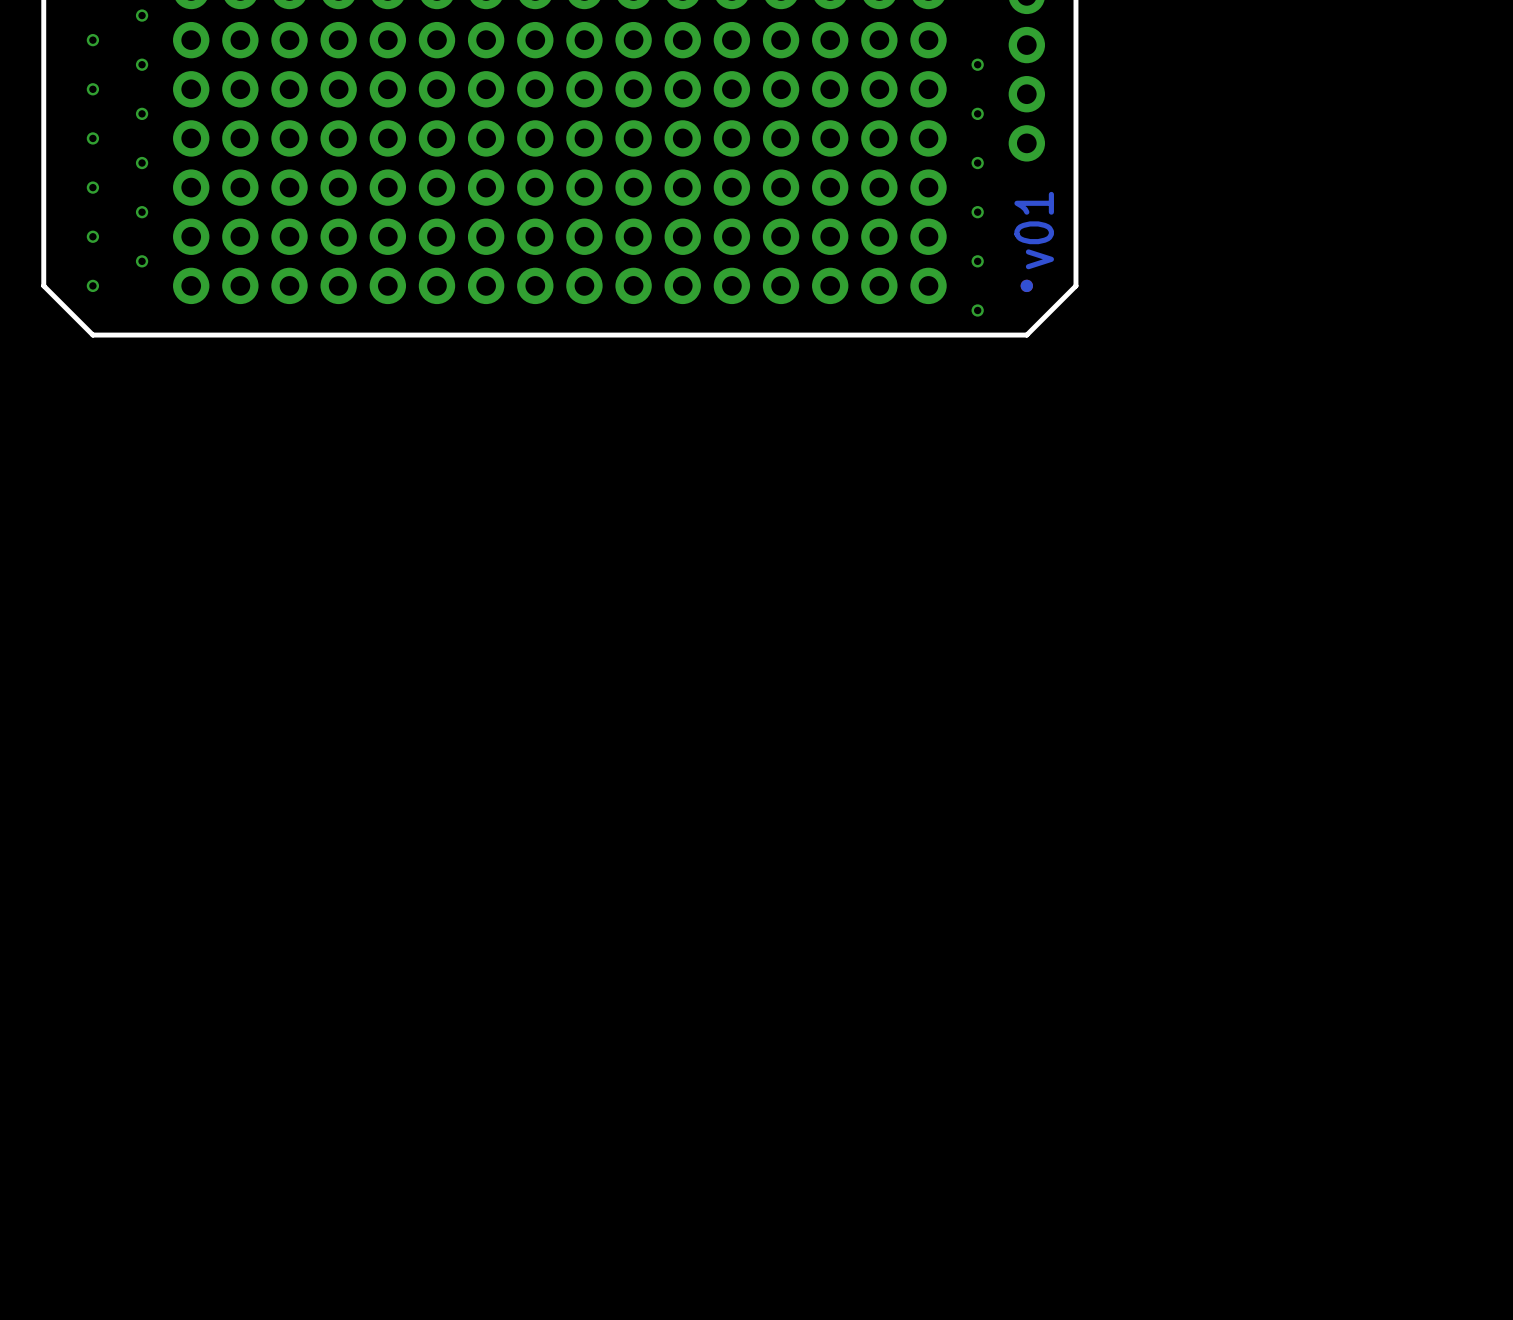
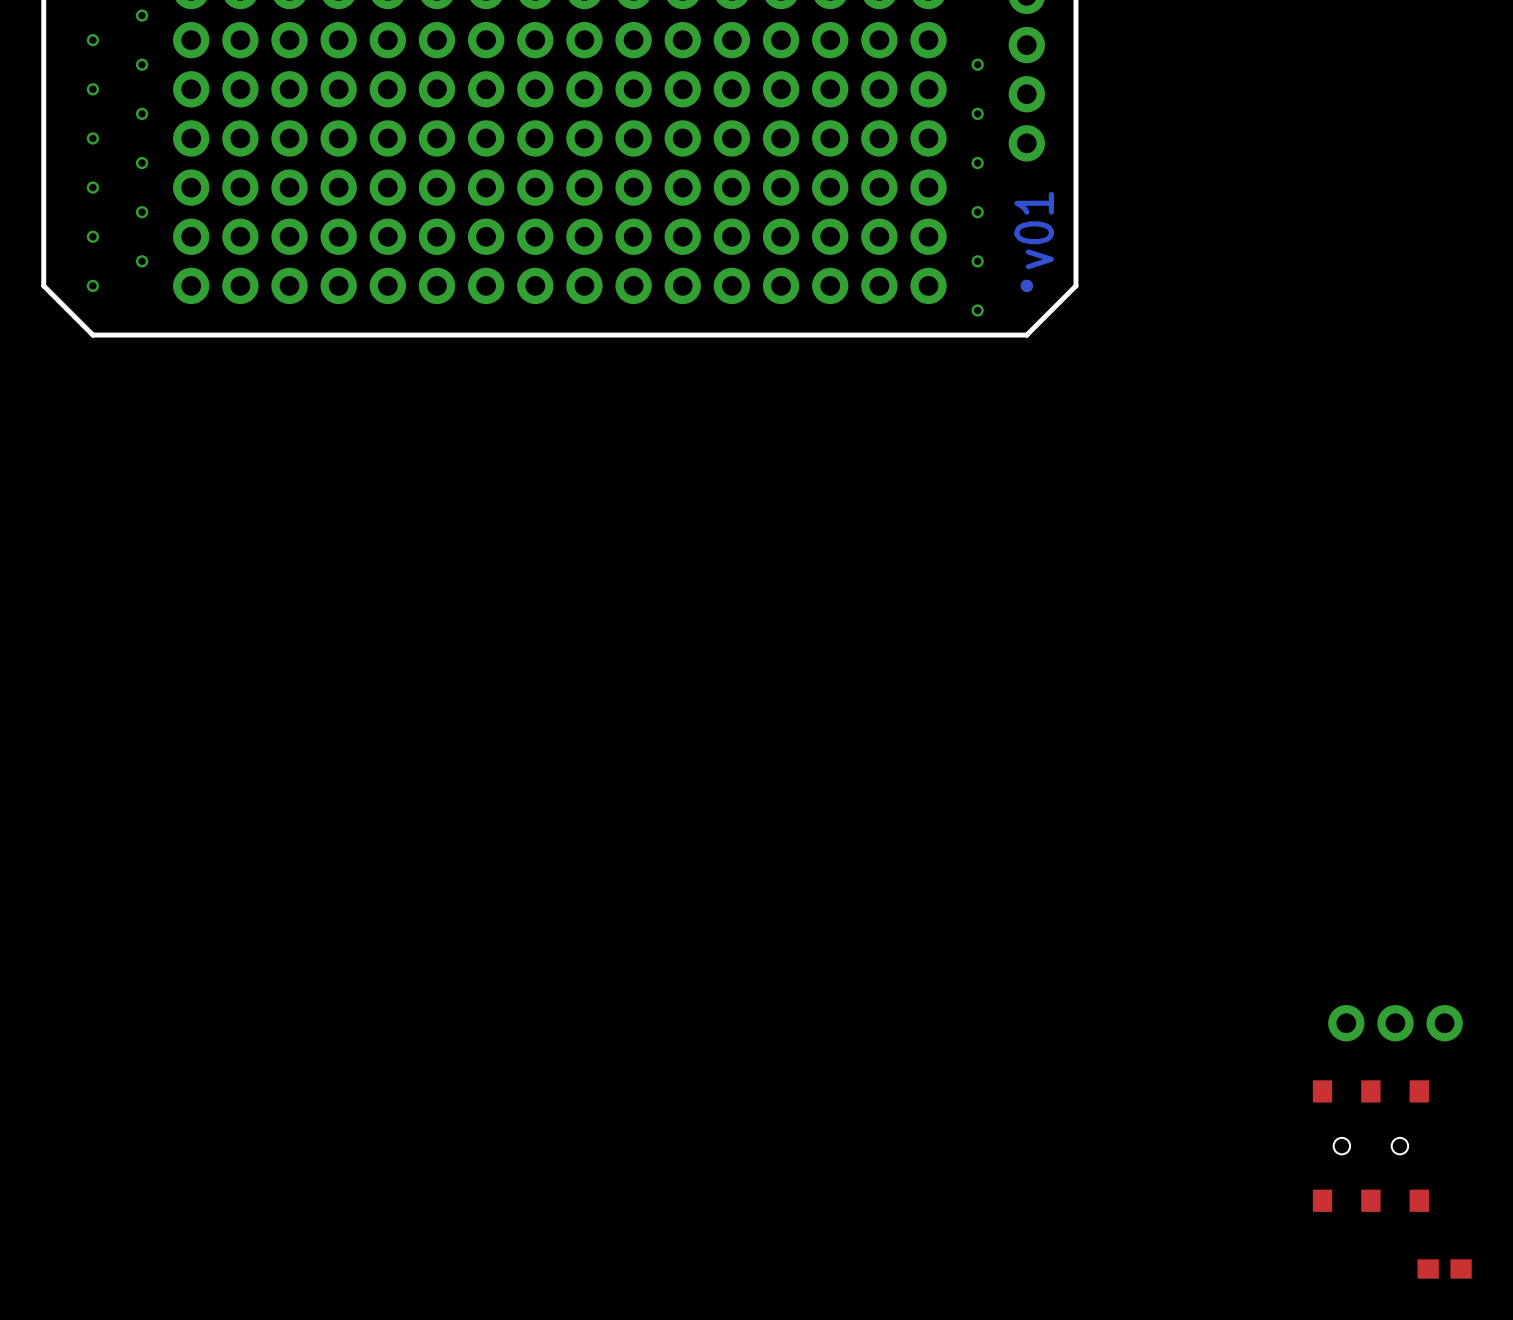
part: none -> (1395, 1023)
part: none -> (1370, 1146)
part: none -> (1444, 1268)

